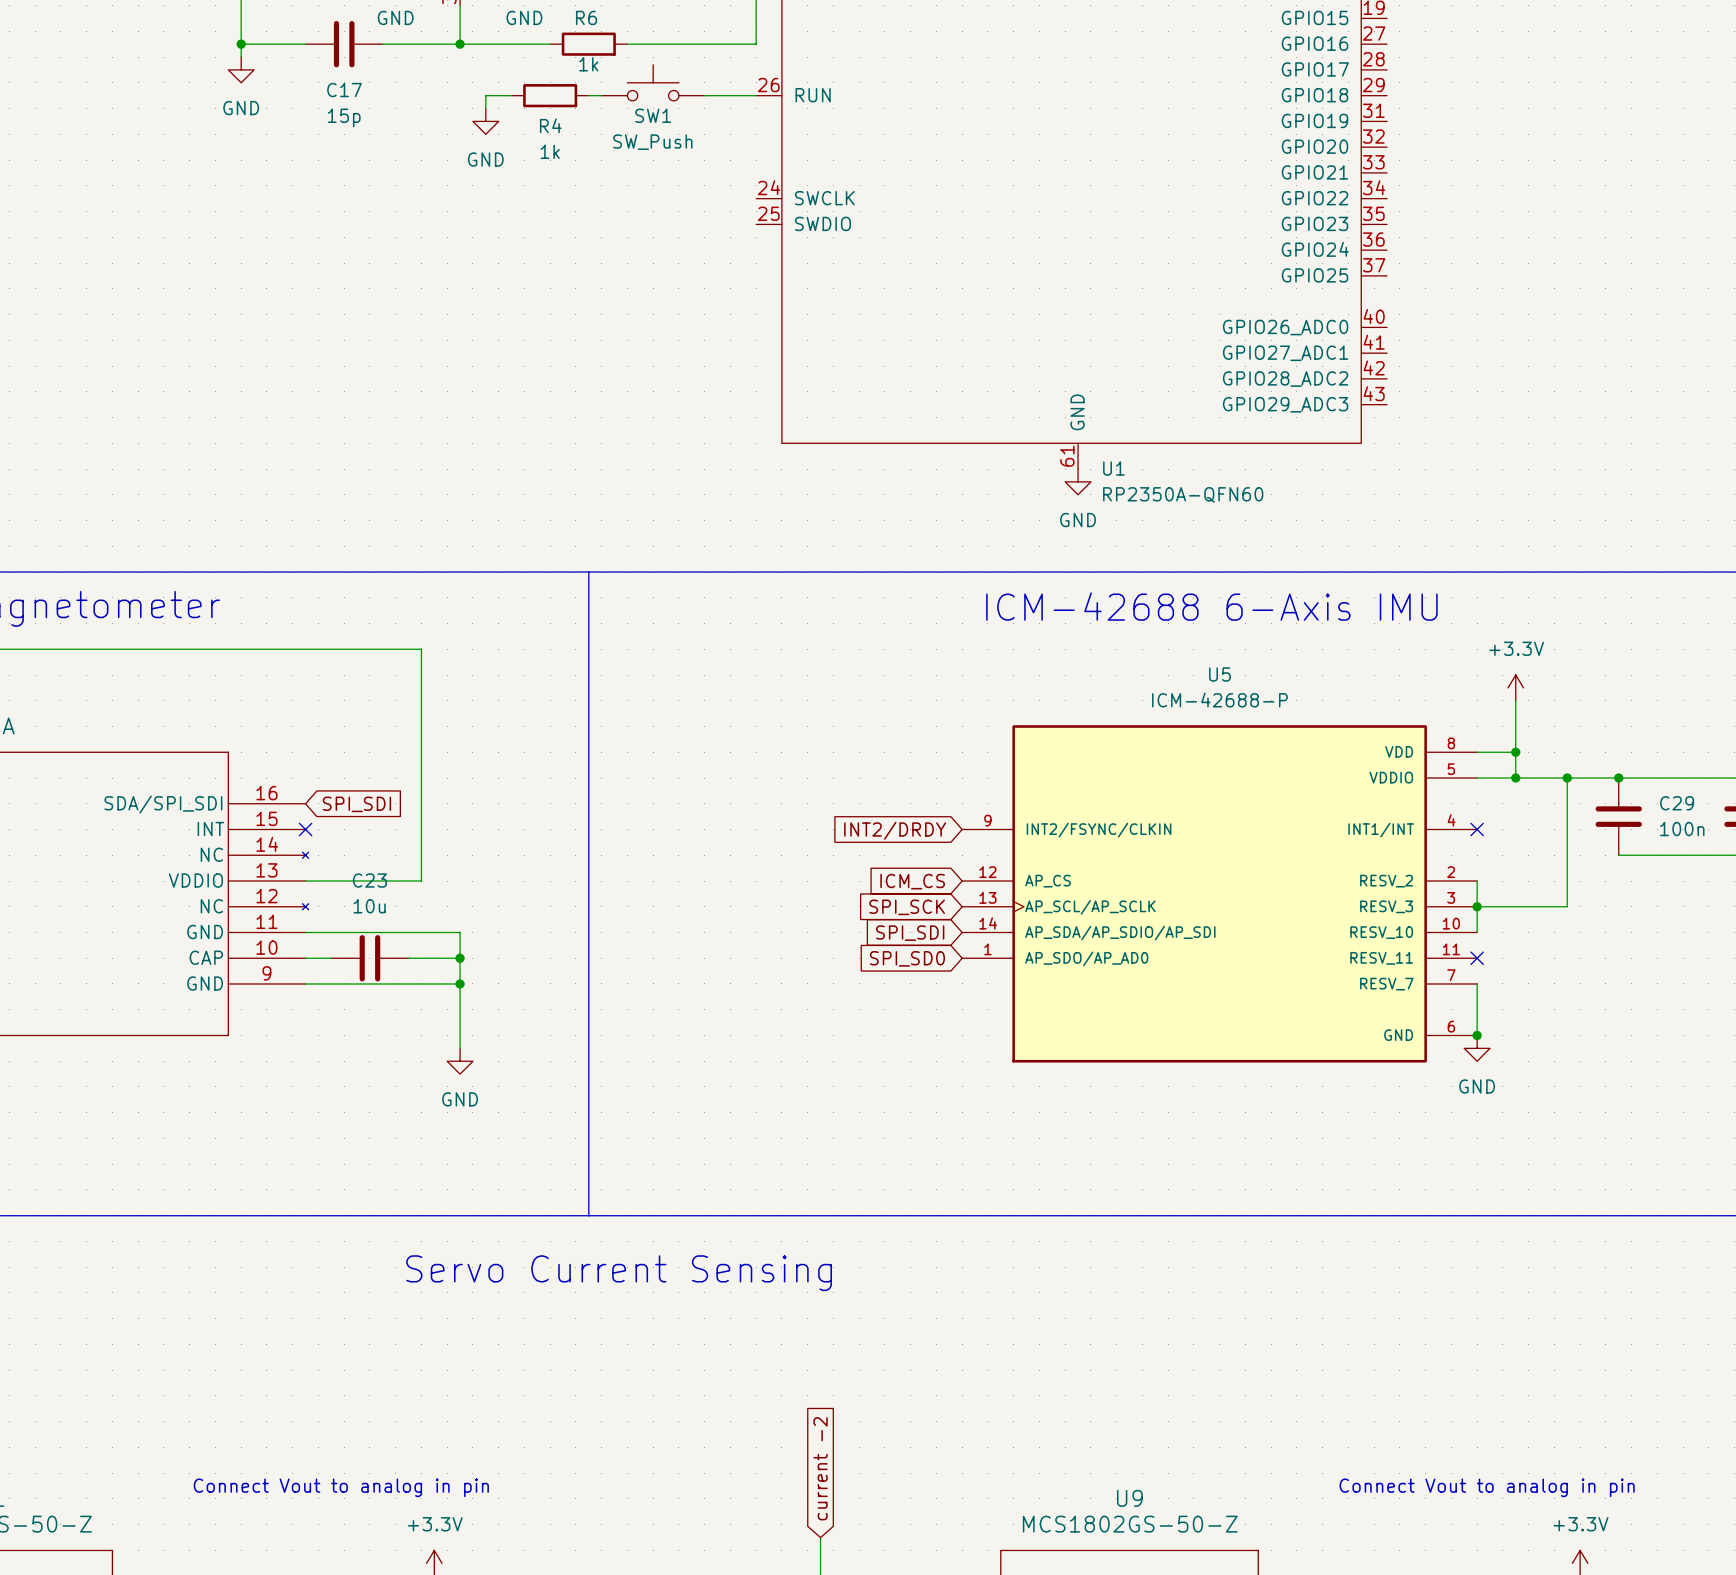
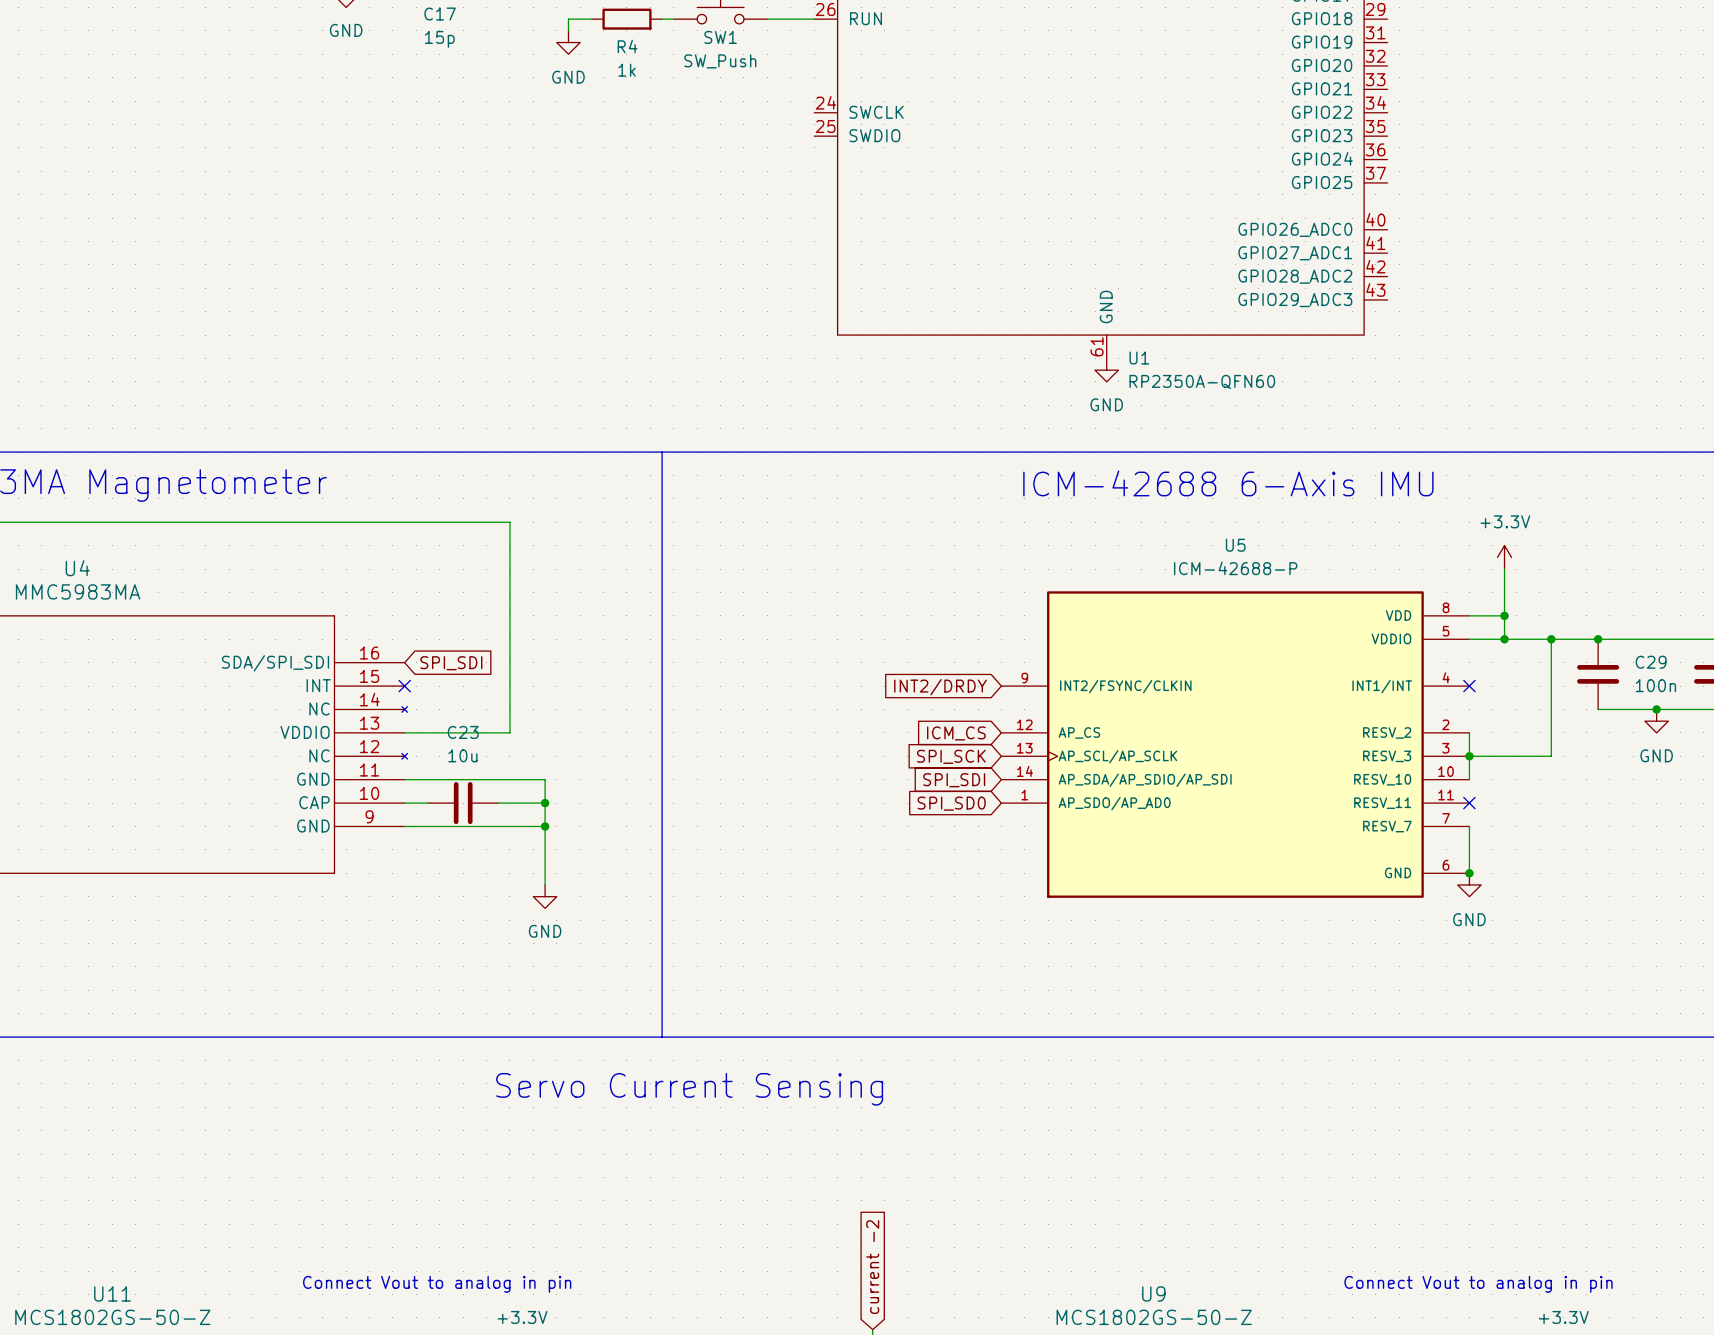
junction: none -> (1656, 709)
power symbol: none -> GND (1656, 721)

